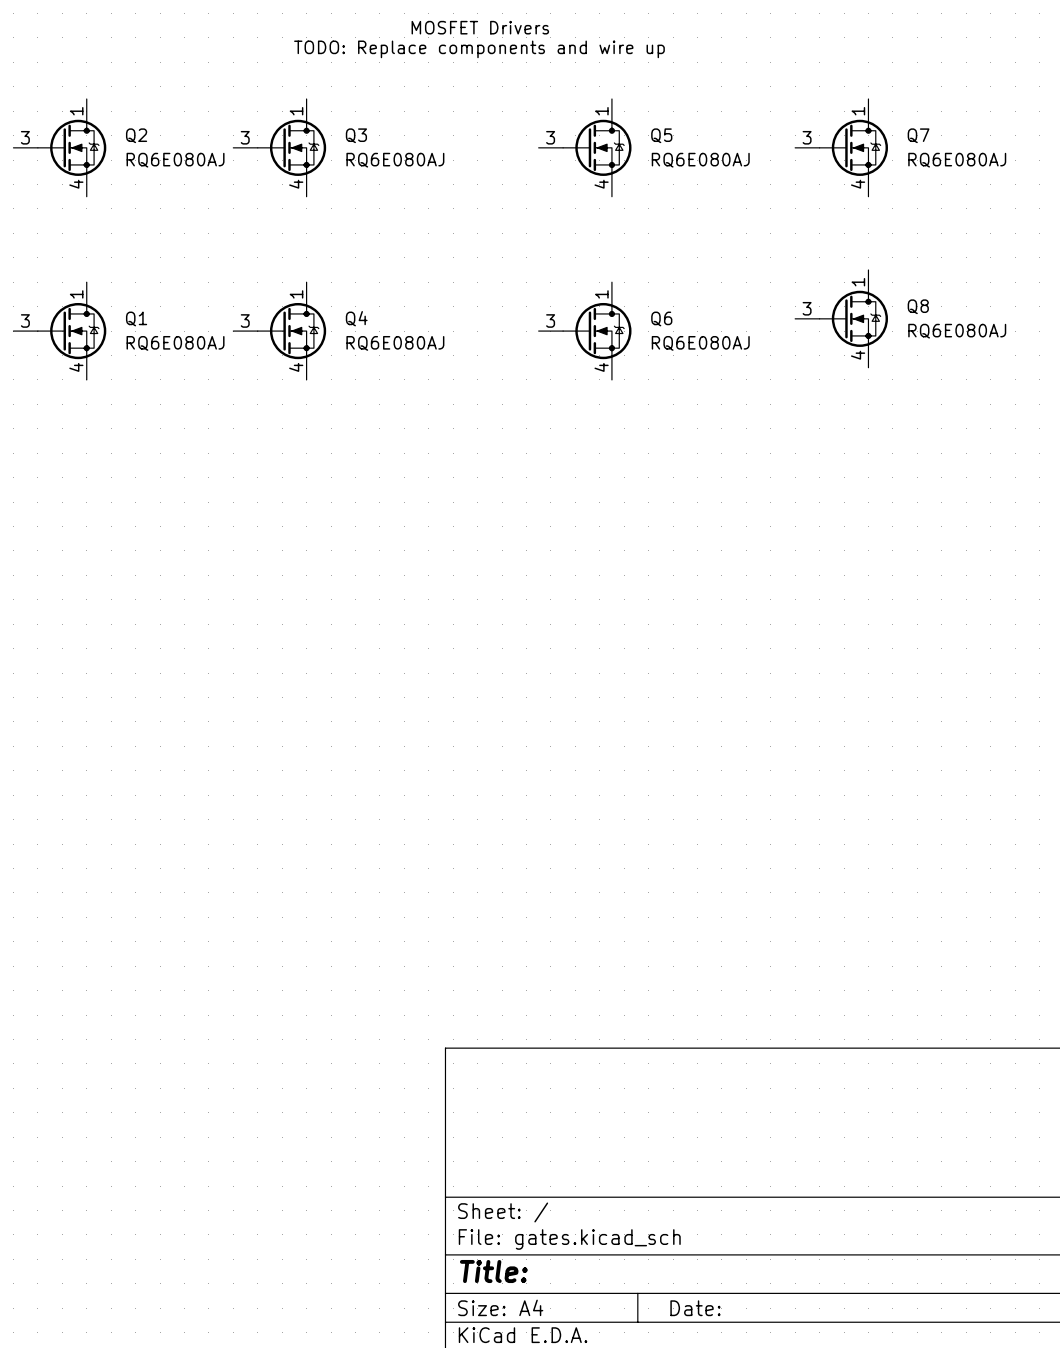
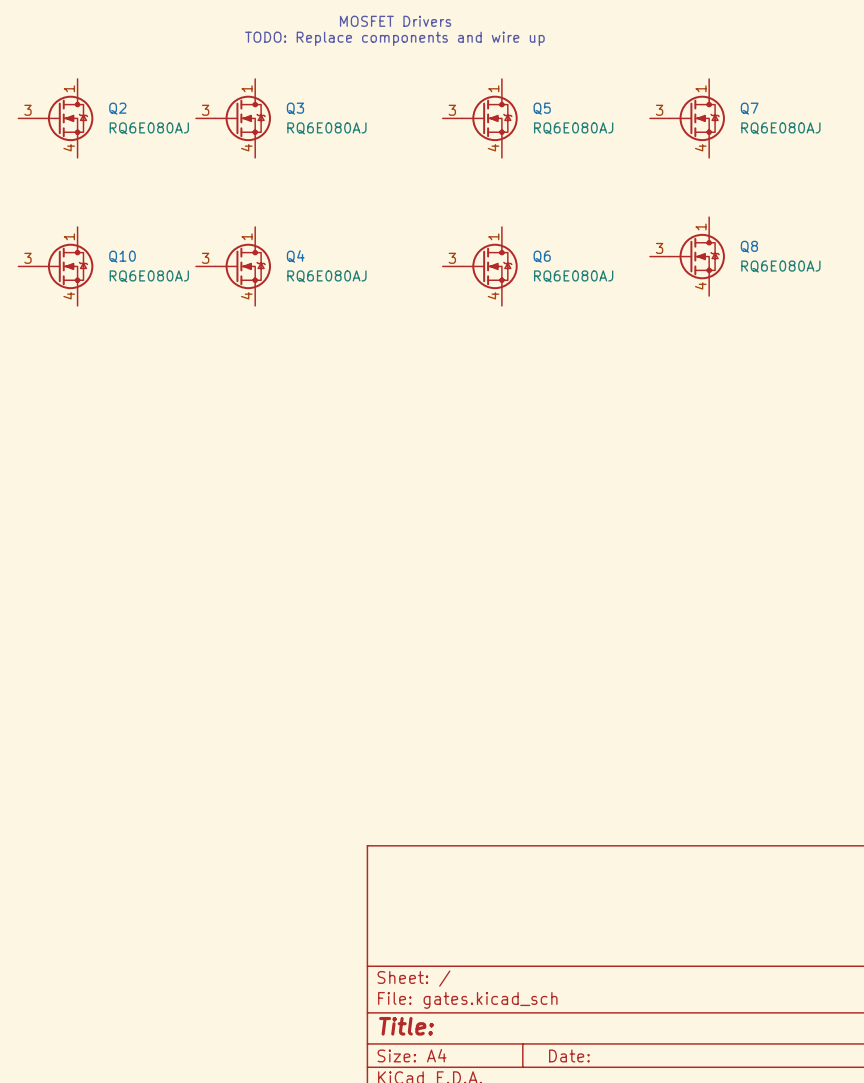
Q1 name: Q1 (136, 318) -> Q10 (122, 256)

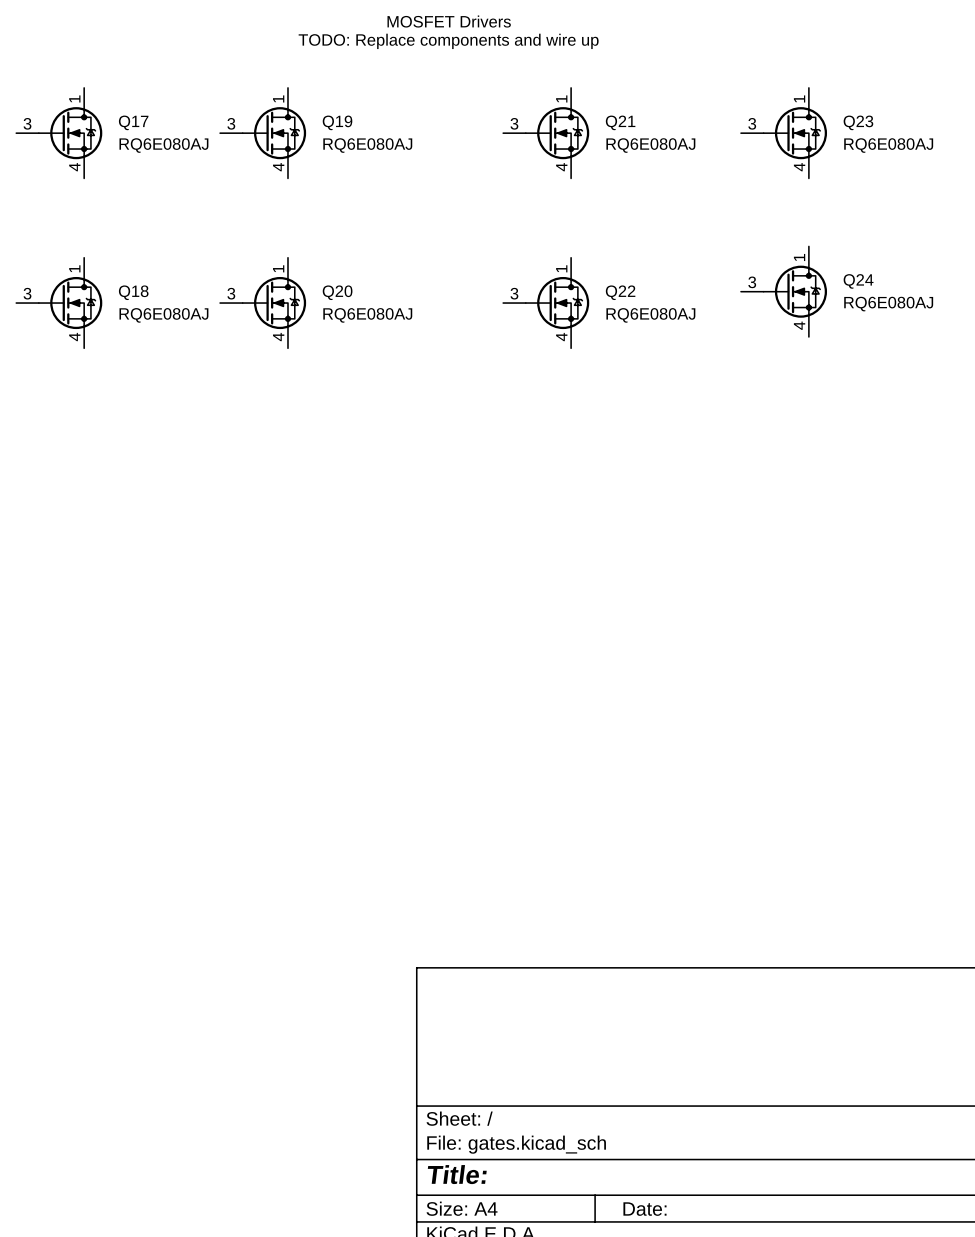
Q2 name: Q2 (117, 108) -> Q17 (133, 122)
Q3 name: Q3 (295, 108) -> Q19 (337, 122)
Q5 name: Q5 (542, 108) -> Q21 (620, 122)
Q7 name: Q7 (749, 108) -> Q23 (858, 122)
Q8 name: Q8 (749, 246) -> Q24 (858, 281)
Q10 name: Q10 (122, 256) -> Q18 (133, 292)
Q4 name: Q4 (295, 256) -> Q20 (337, 292)
Q6 name: Q6 (542, 256) -> Q22 (620, 292)

